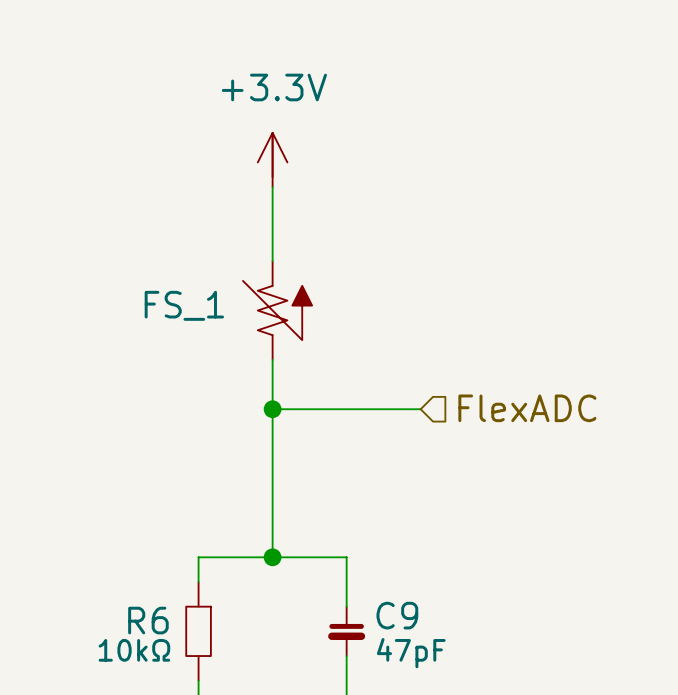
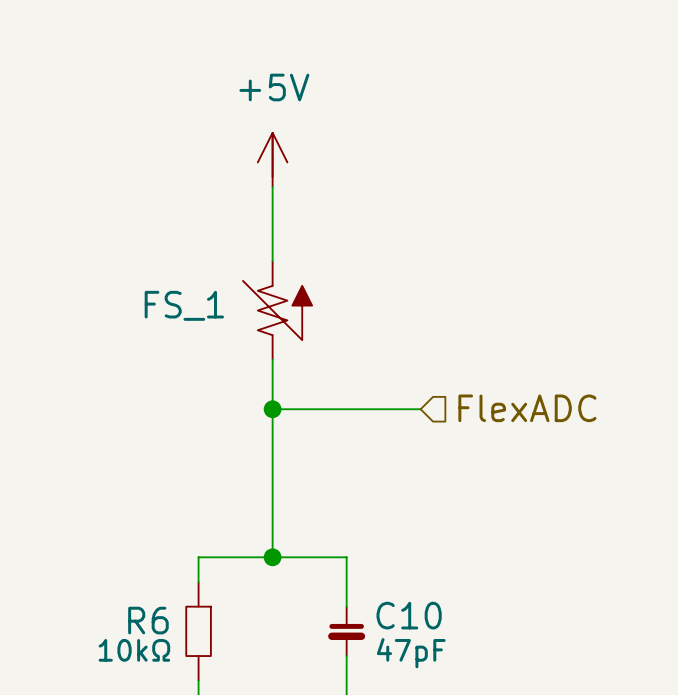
power symbol: +3.3V (272, 159) -> +5V (272, 159)
C9 name: C9 (397, 615) -> C10 (409, 615)

